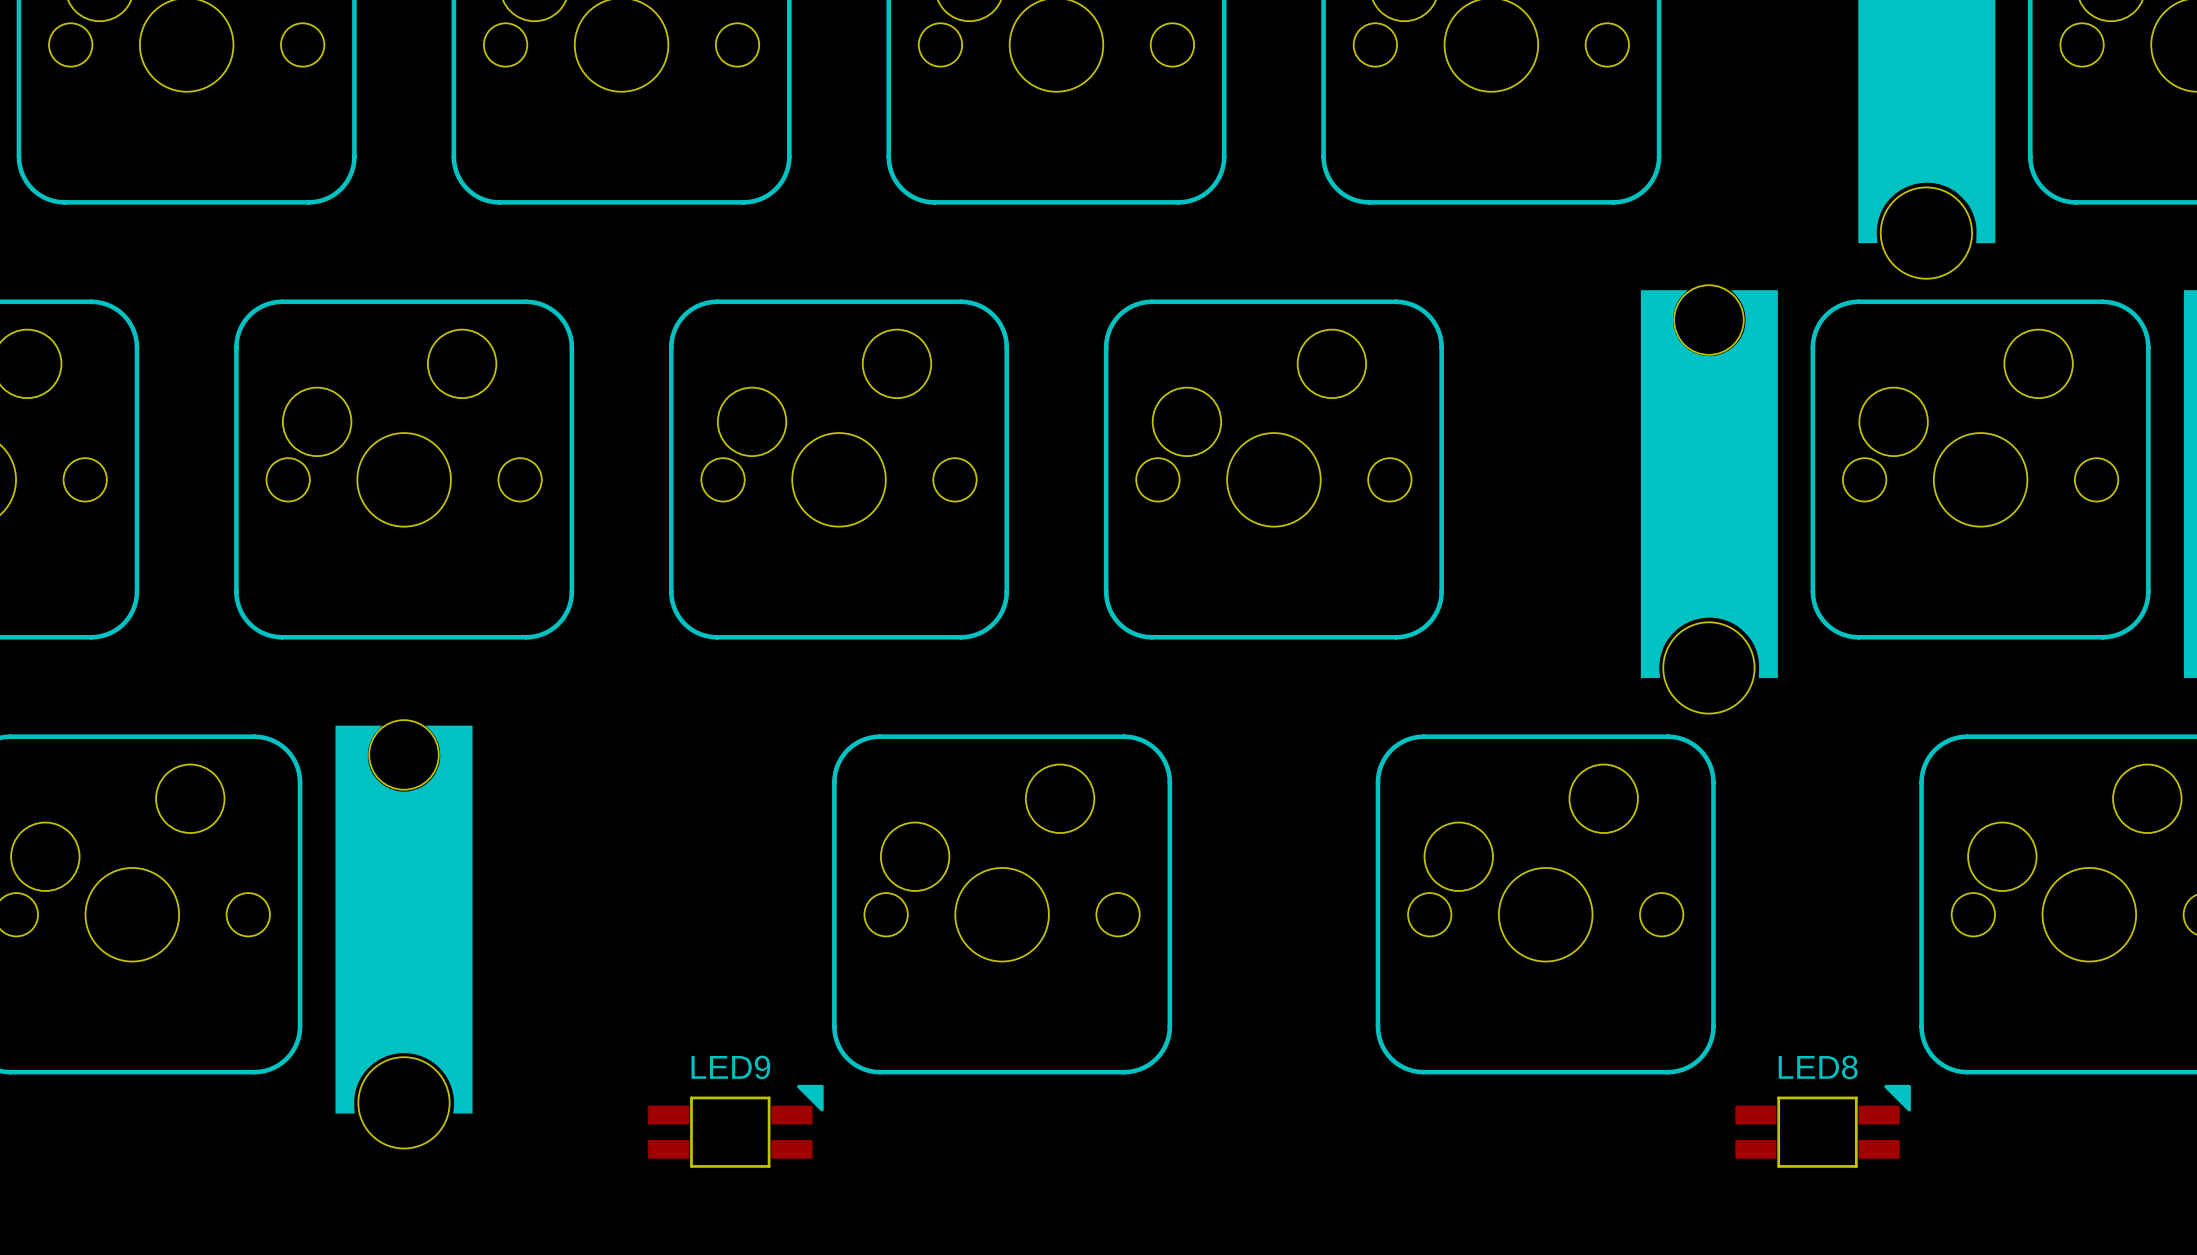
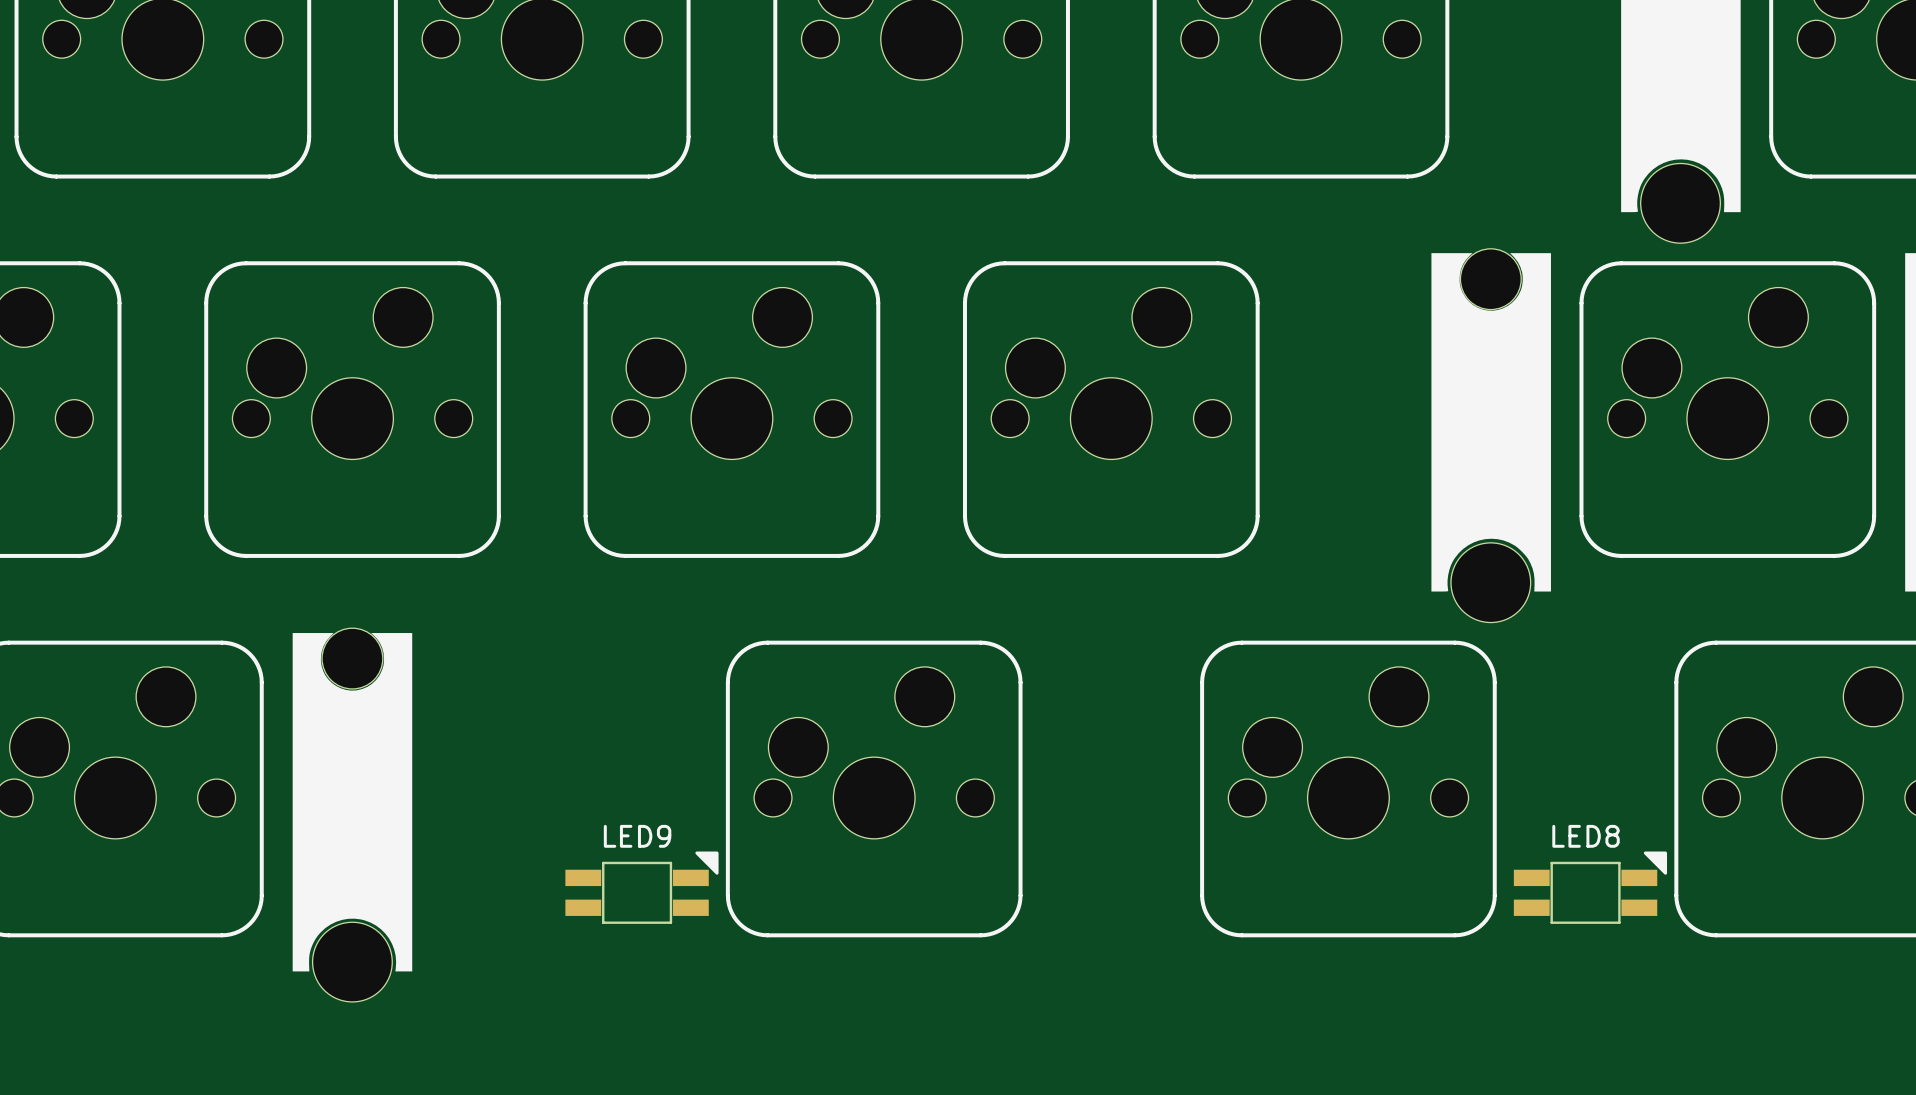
LED9 position: (735, 1126) -> (641, 887)
LED8 position: (1823, 1126) -> (1590, 887)

